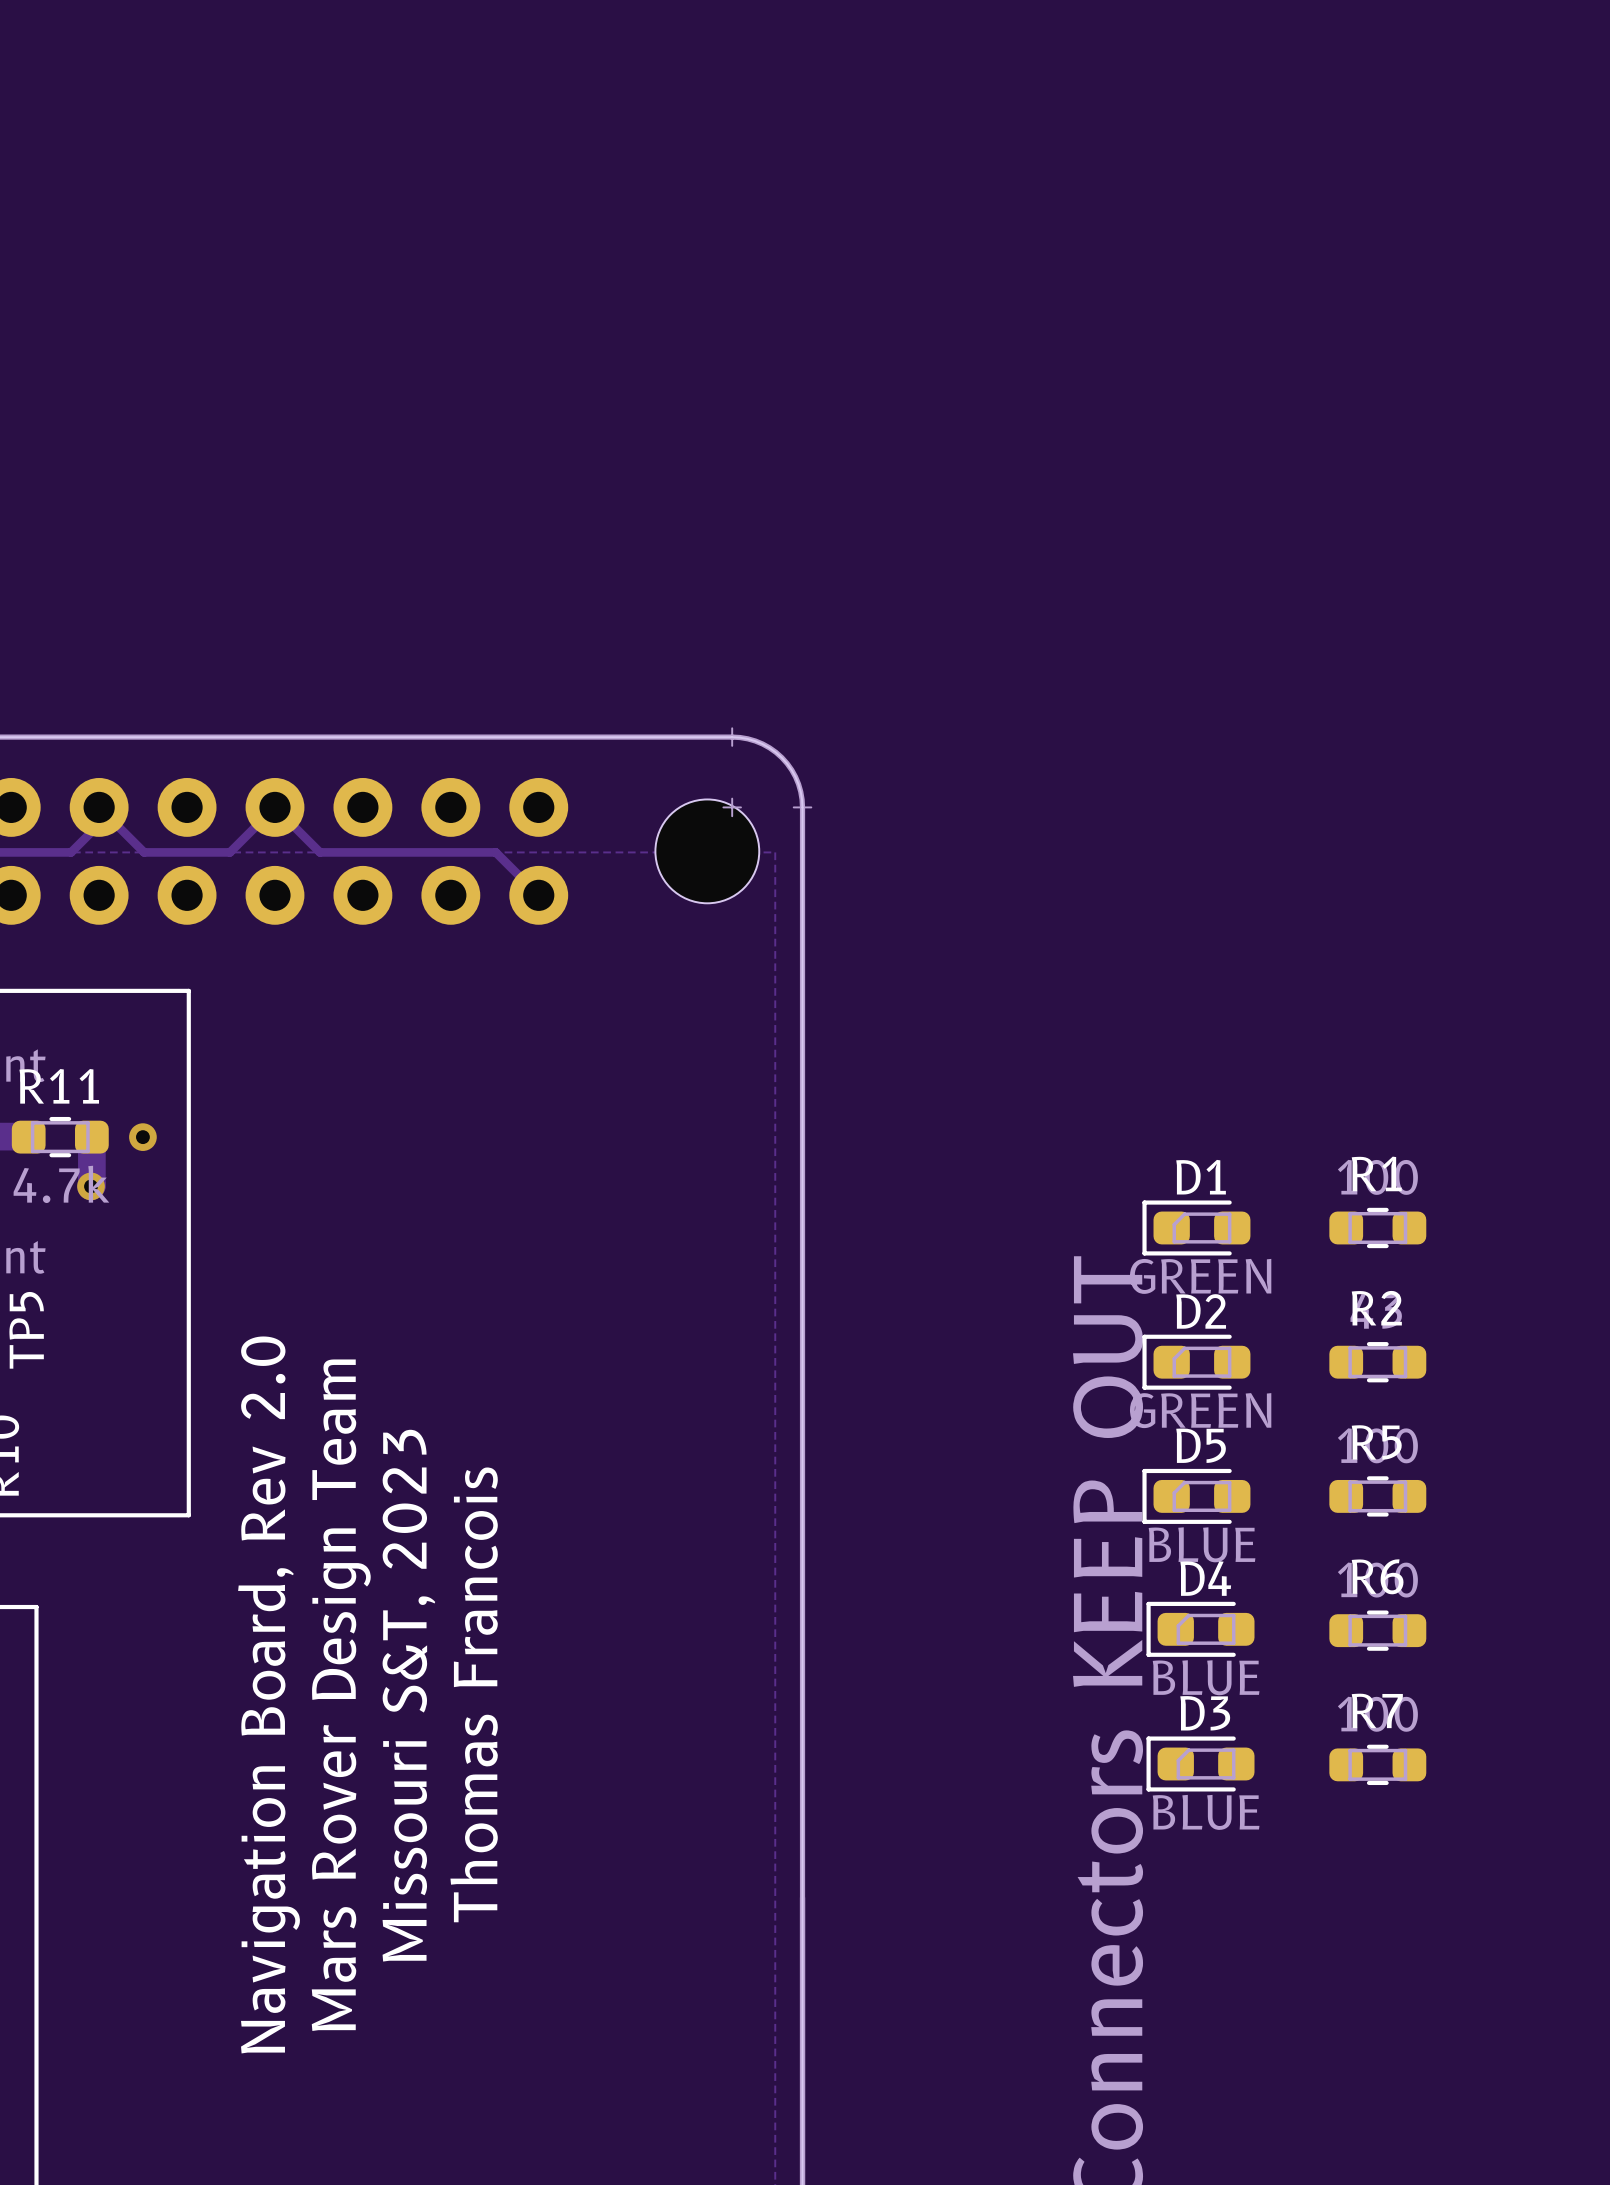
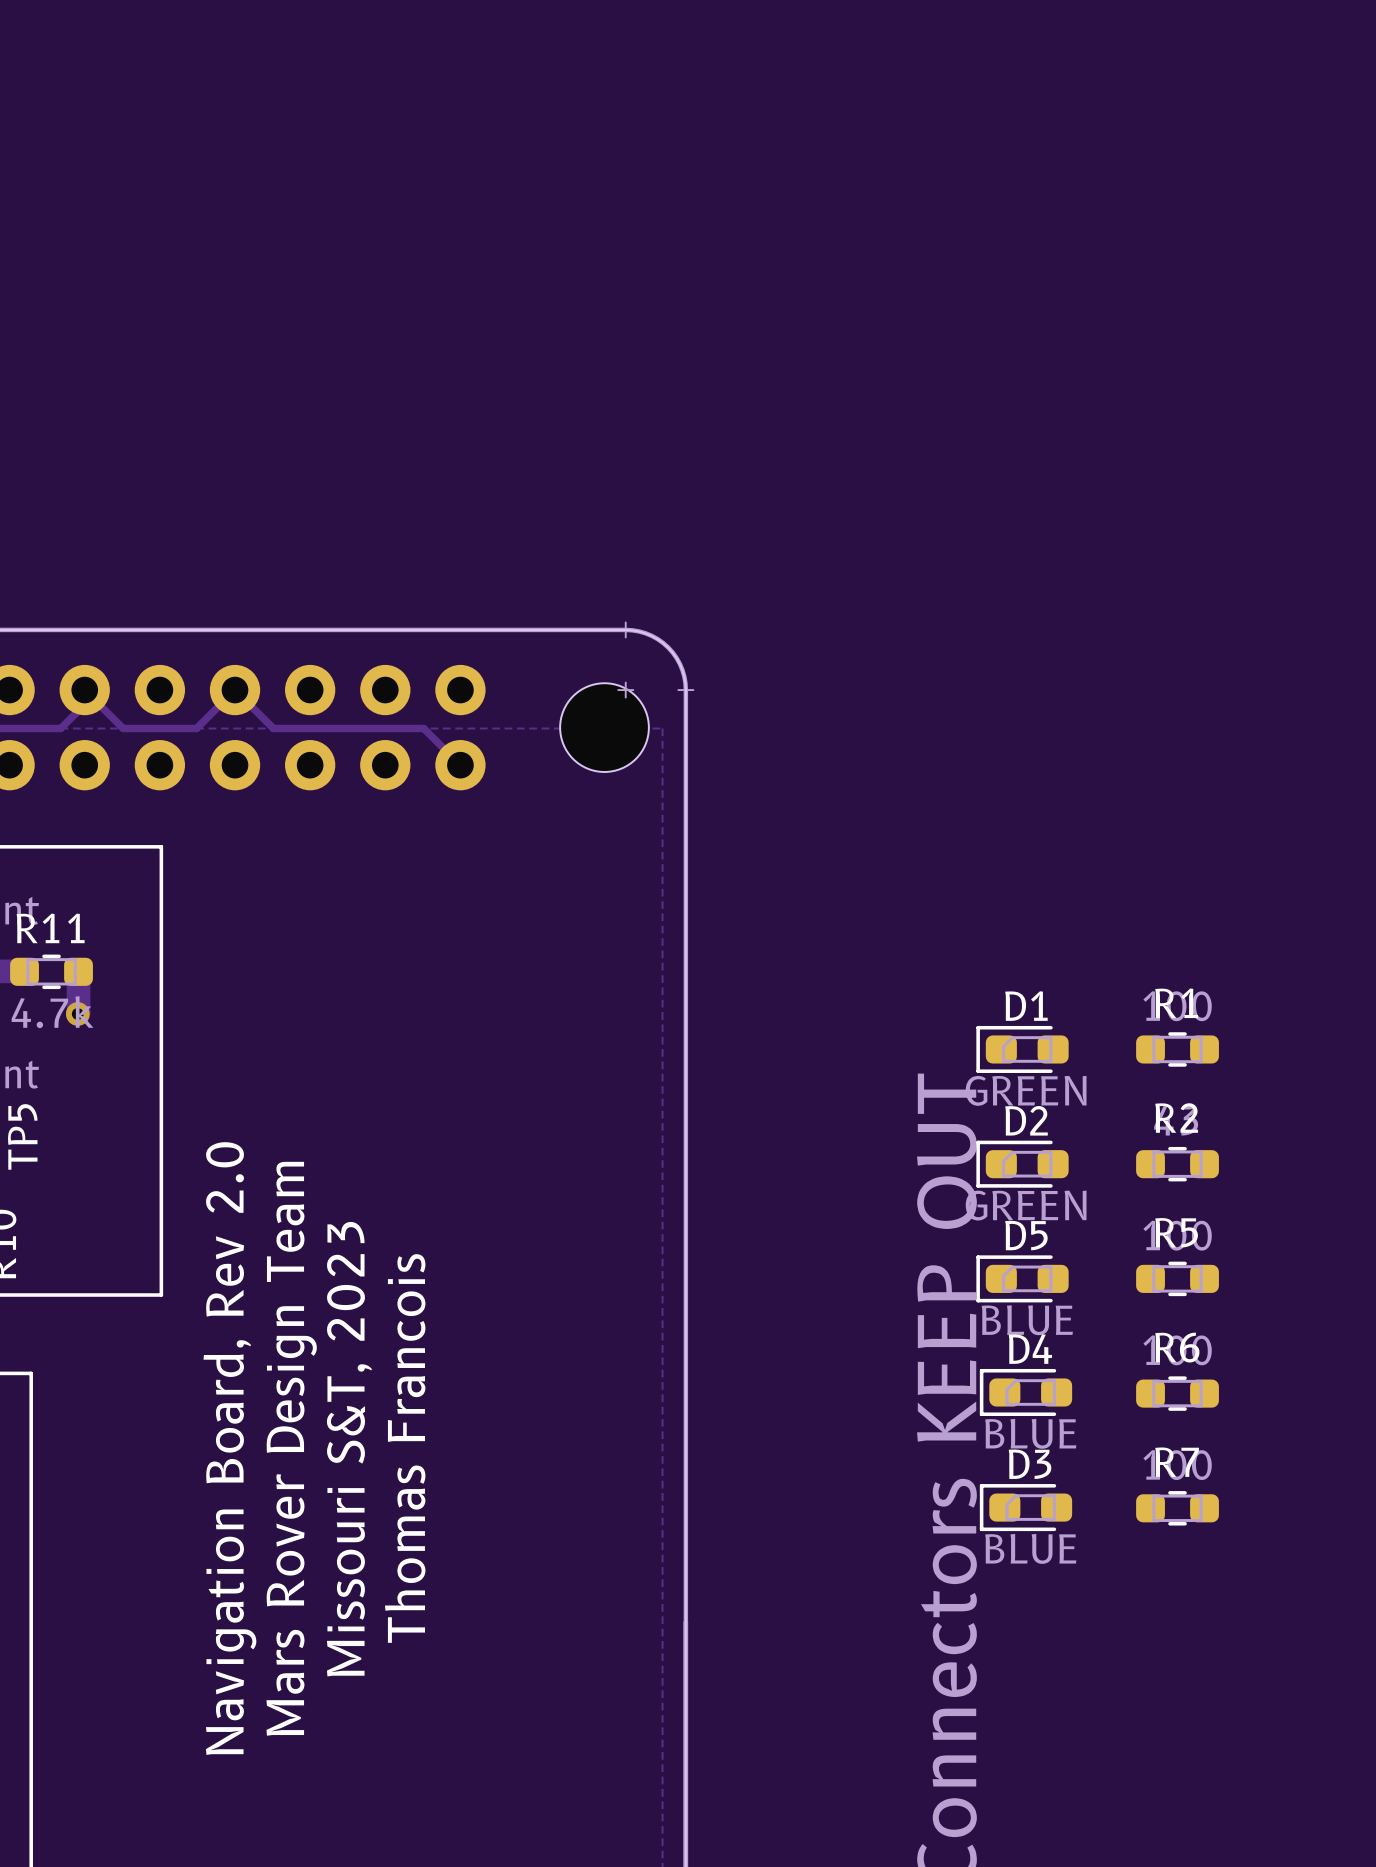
via: (142, 1137) -> none

